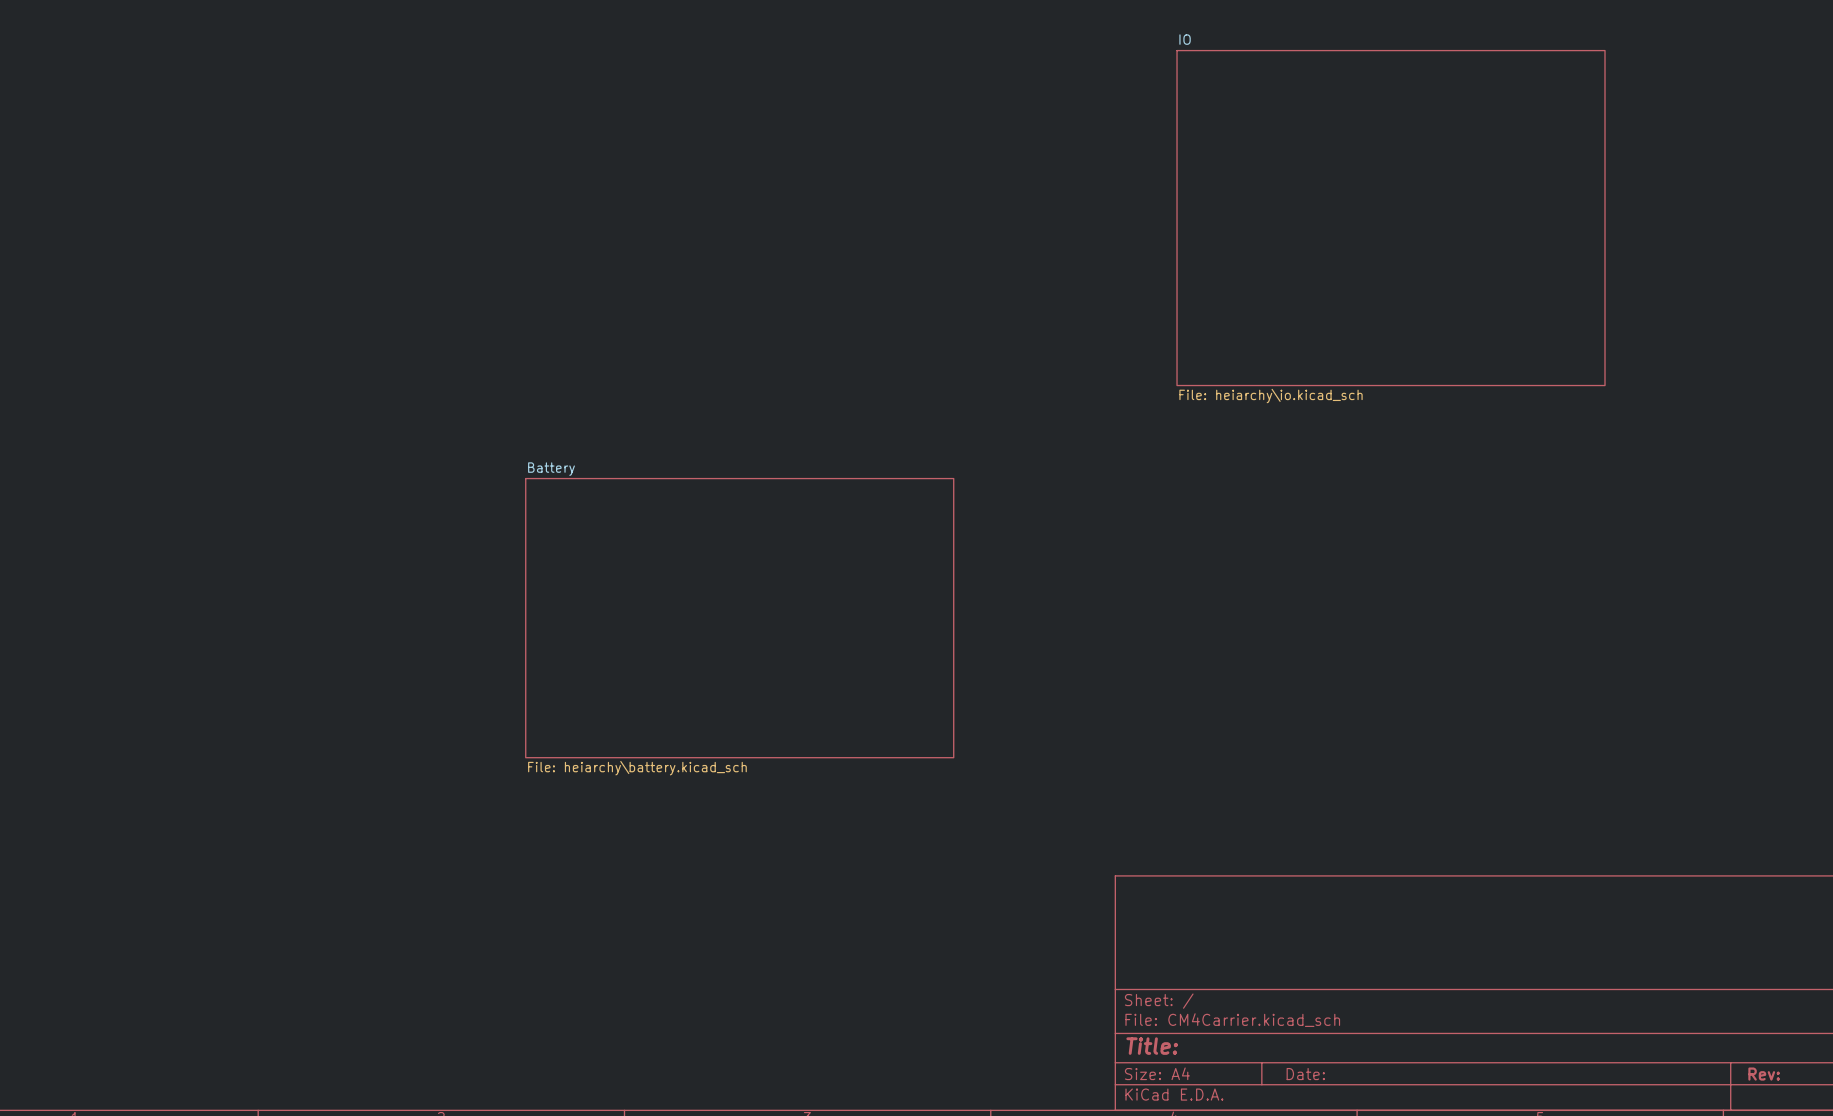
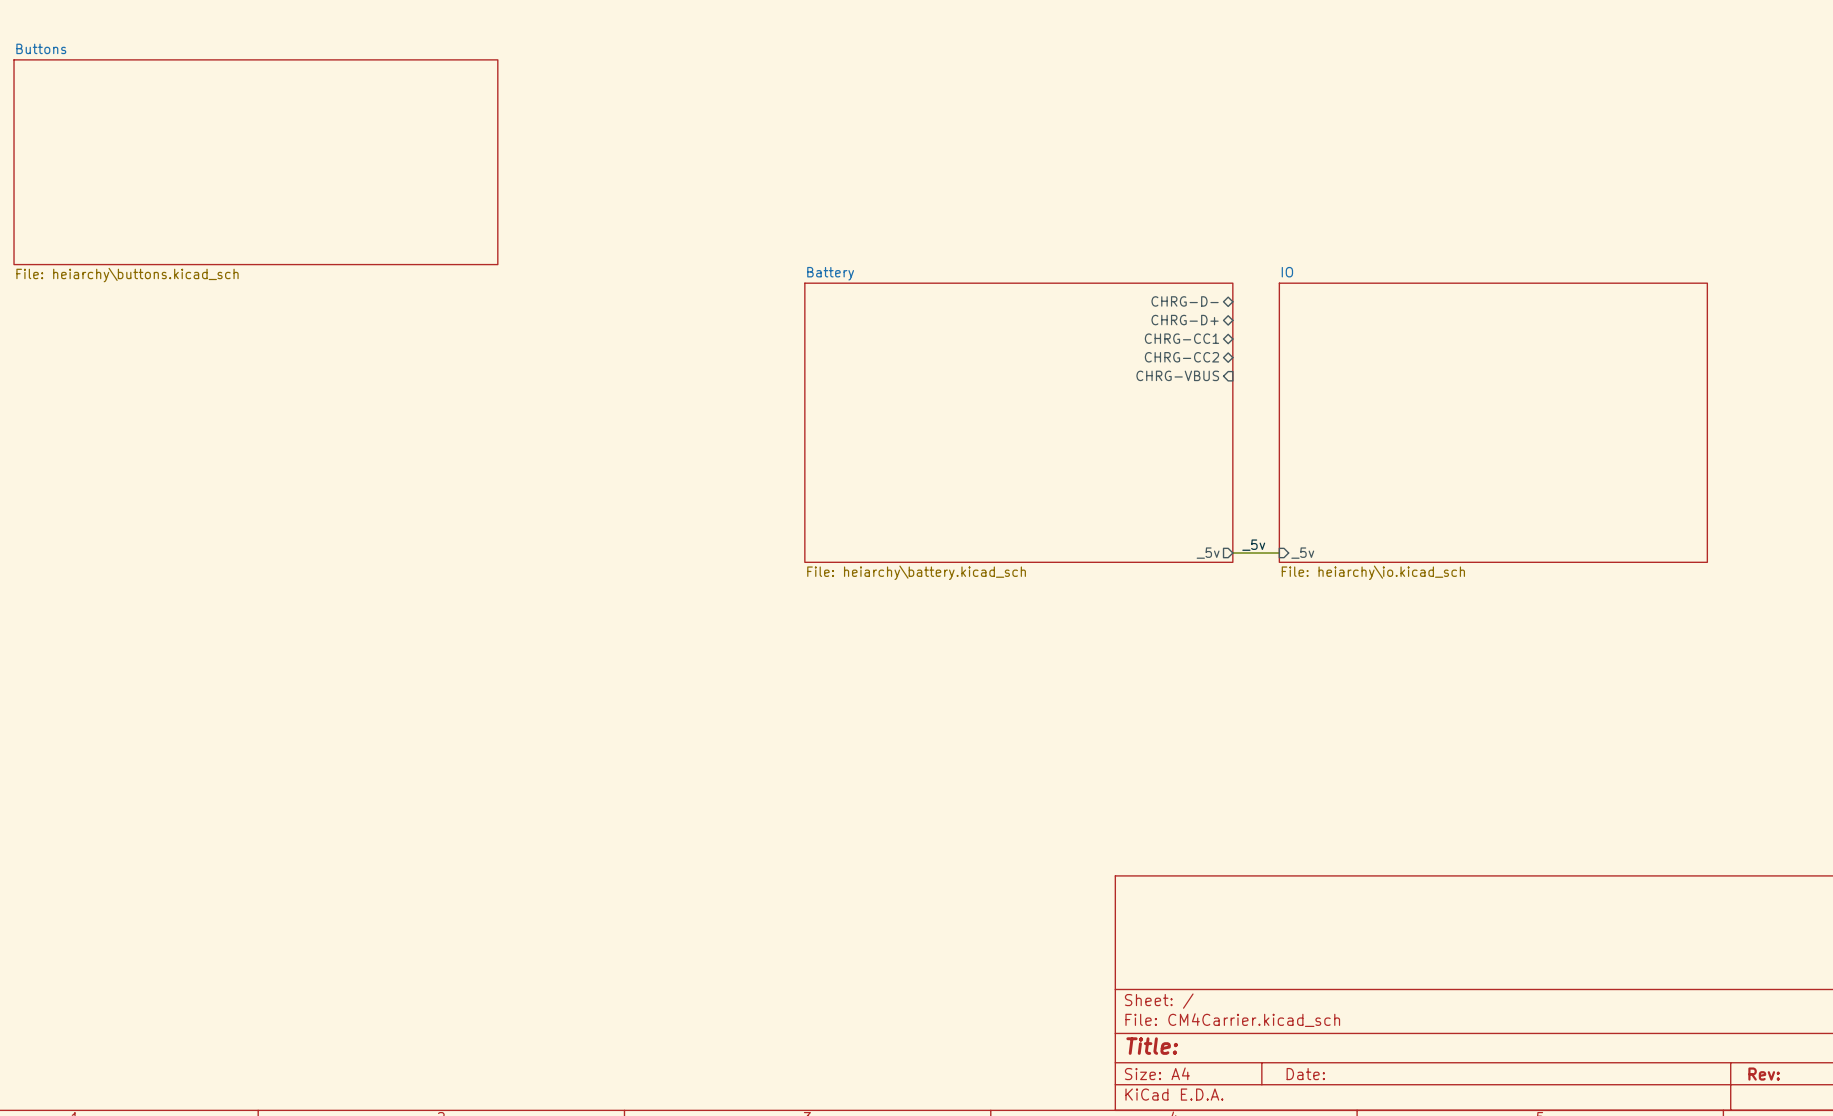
sheet Buttons: none -> File: heiarchy\buttons.kicad_sch (255, 162)
sheet IO: File: heiarchy\io.kicad_sch (1391, 218) -> none
sheet pin: none -> CHRG-D- (1185, 301)
sheet pin: none -> CHRG-D+ (1185, 320)
sheet pin: none -> CHRG-CC1 (1181, 338)
sheet pin: none -> CHRG-CC2 (1181, 357)
sheet pin: none -> CHRG-VBUS (1177, 375)
sheet Battery: none -> File: heiarchy\battery.kicad_sch (1018, 422)
sheet IO: none -> File: heiarchy\io.kicad_sch (1493, 422)
label: none -> _5v (1253, 545)
sheet pin: none -> _5v (1208, 553)
wire: none -> (1232, 553) (1279, 553)
sheet pin: none -> _5v (1302, 553)
sheet Battery: File: heiarchy\battery.kicad_sch (739, 618) -> none

